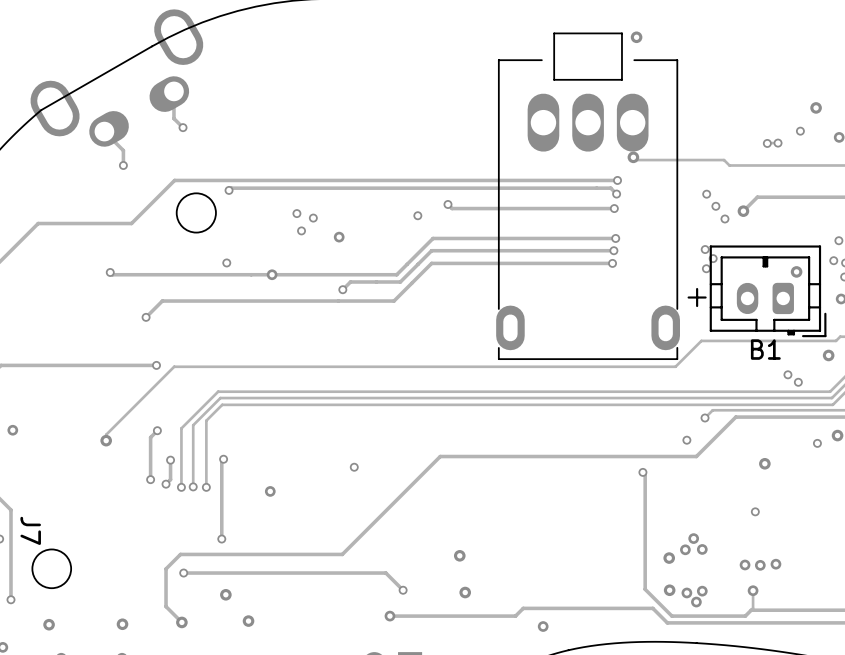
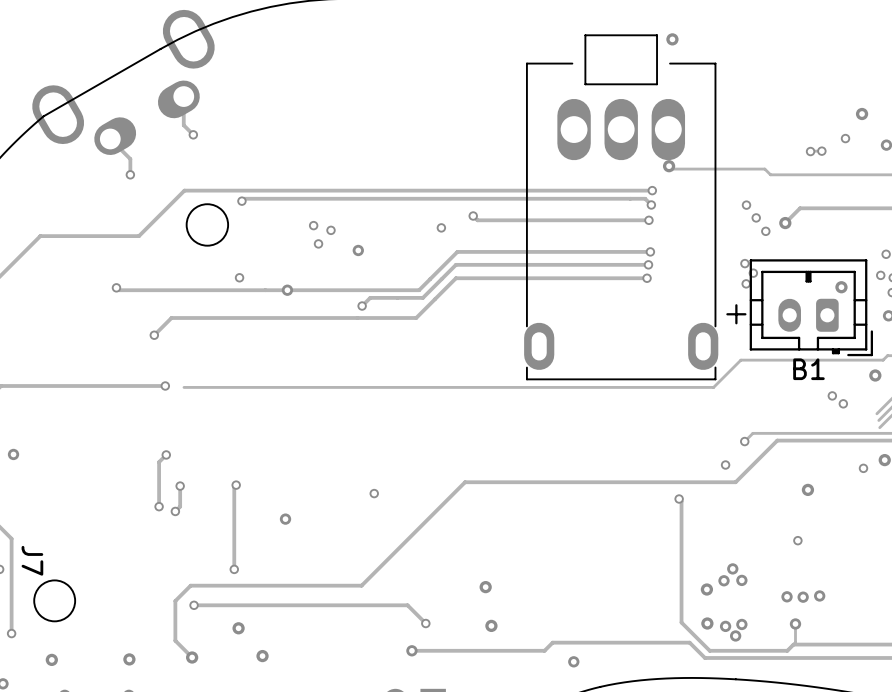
track: (174, 366) (106, 434) (106, 440) -> none
track: (830, 391) (218, 391) (181, 428) (181, 487) -> none
track: (831, 398) (220, 398) (193, 425) (193, 486) -> none
track: (832, 404) (222, 404) (206, 420) (206, 487) -> none
via: (106, 440) -> none
via: (193, 486) -> none
via: (181, 487) -> none
via: (206, 487) -> none

